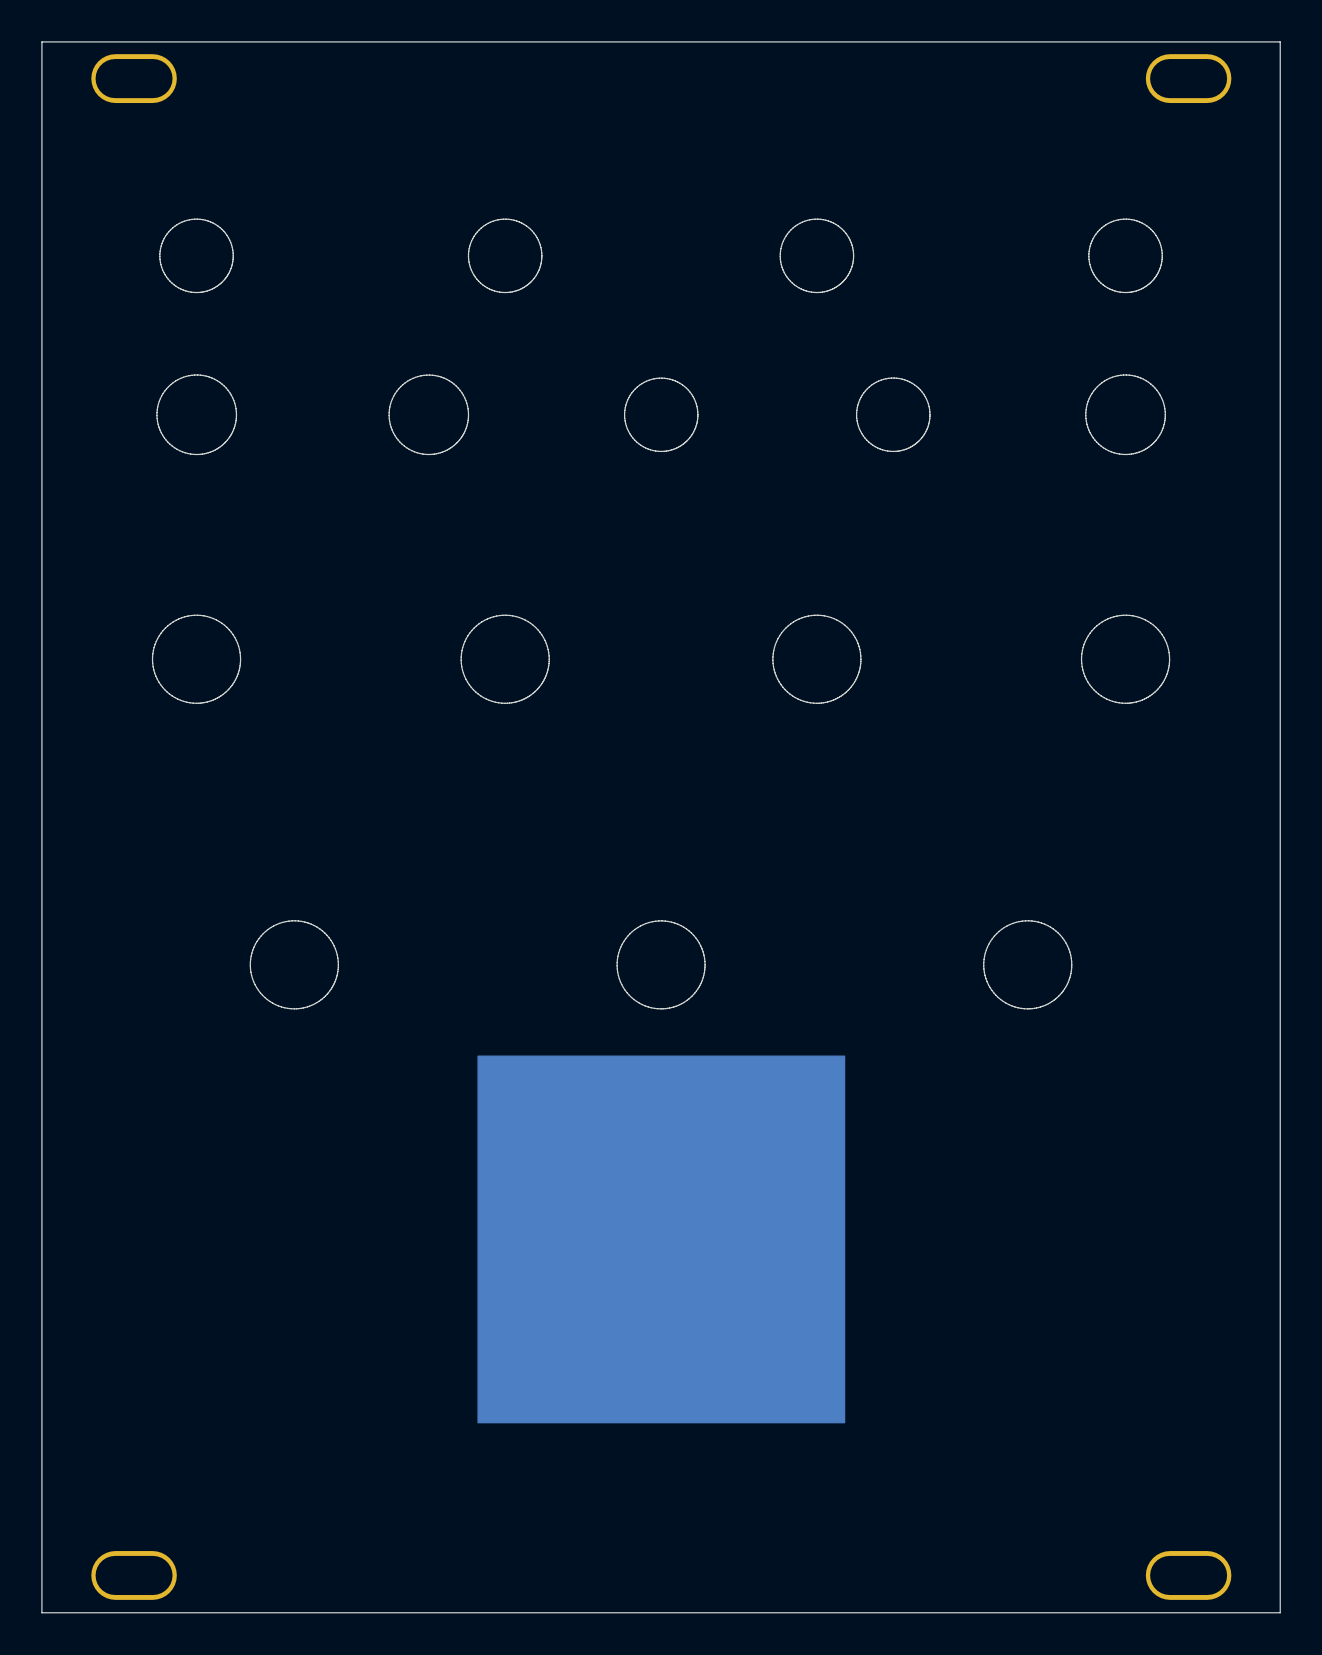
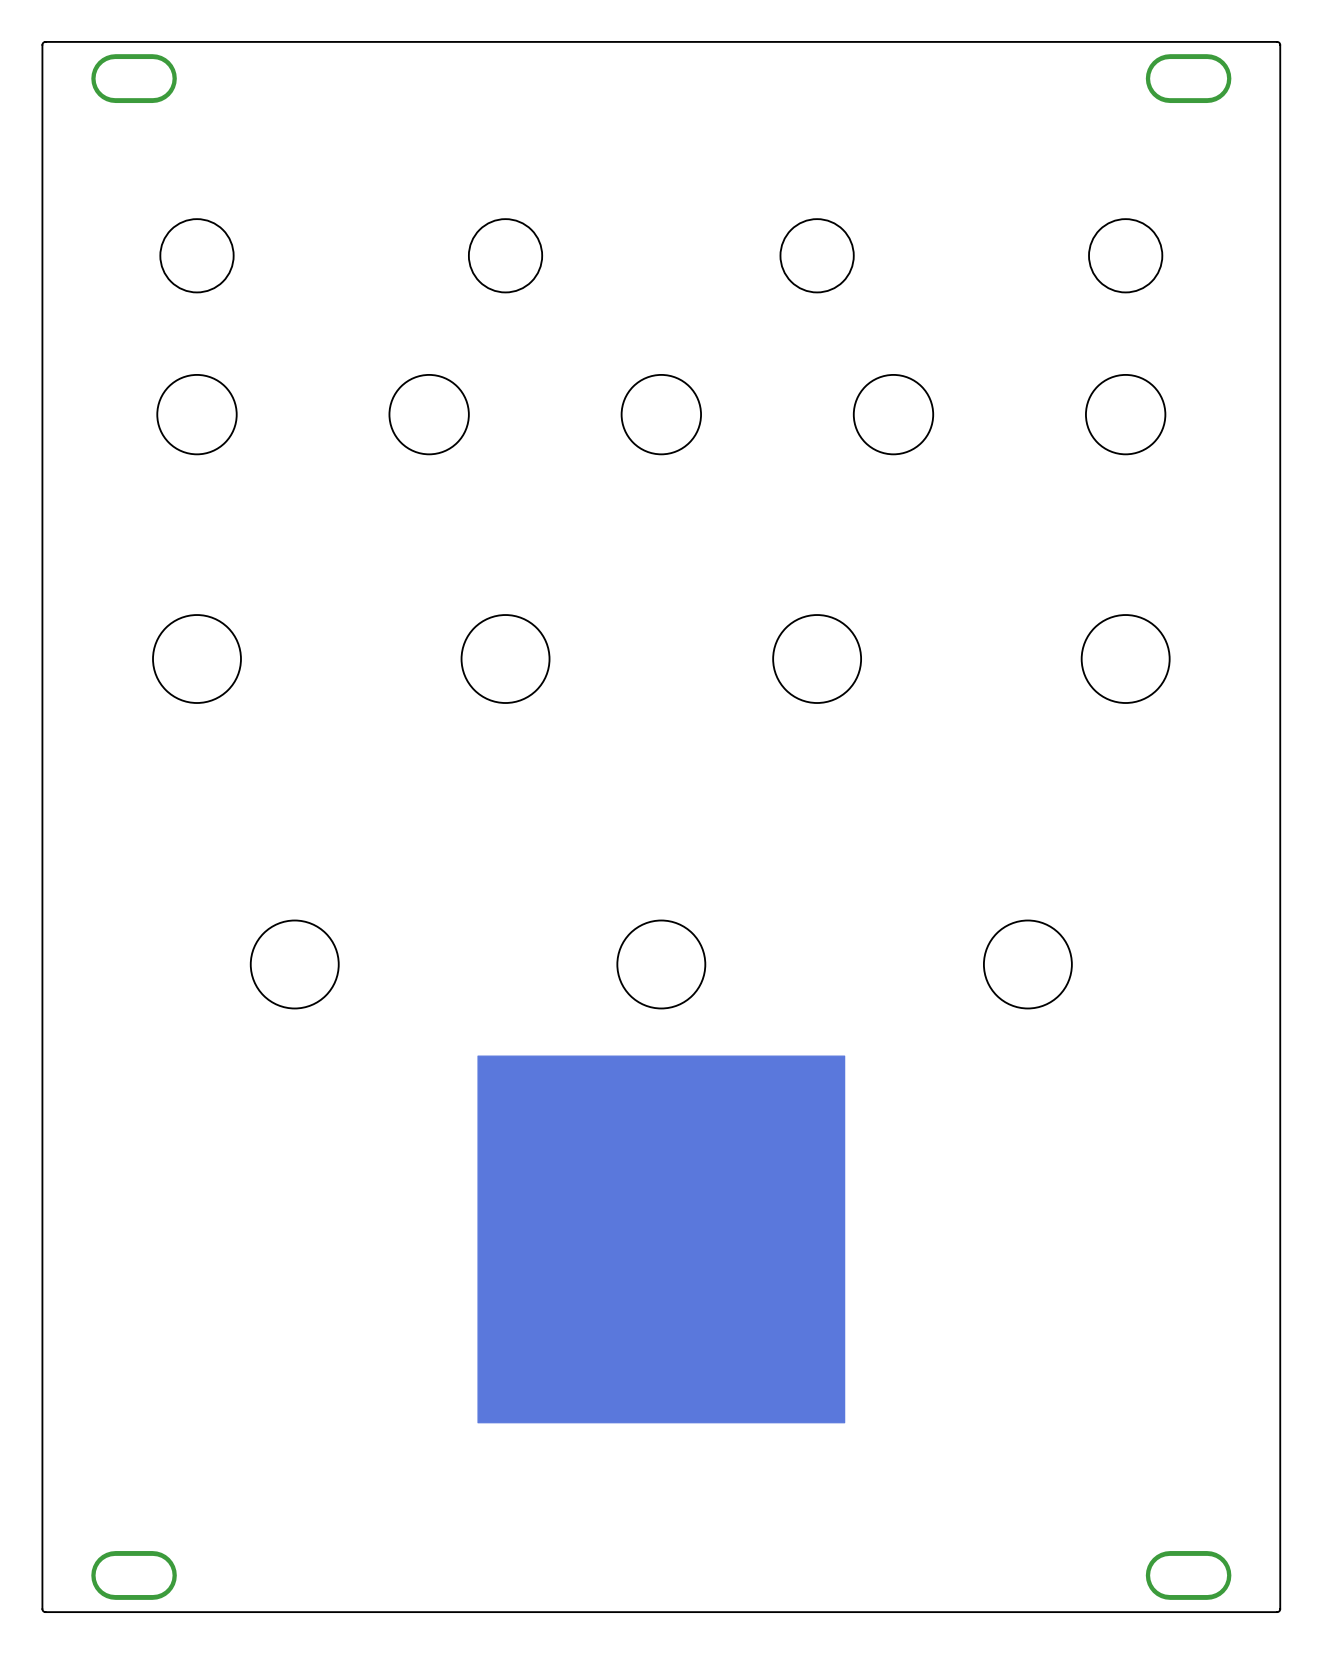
drawing: [41, 41, 1281, 1614] -> none
board edge: none -> (1277, 41) (43, 43) (43, 1611) (1279, 1610) (1280, 44) (1277, 41)
round board edge: none -> [160, 218, 234, 293]
round board edge: none -> [468, 218, 543, 293]
round board edge: none -> [780, 218, 855, 293]
round board edge: none -> [1088, 218, 1163, 293]
round board edge: none -> [156, 374, 238, 455]
round board edge: none -> [389, 374, 470, 455]
round board edge: none -> [621, 374, 702, 455]
round board edge: none -> [853, 374, 934, 455]
round board edge: none -> [1085, 374, 1166, 455]
round board edge: none -> [152, 614, 242, 704]
round board edge: none -> [461, 614, 550, 704]
round board edge: none -> [772, 614, 862, 704]
round board edge: none -> [1081, 614, 1170, 704]
round board edge: none -> [250, 920, 340, 1009]
round board edge: none -> [617, 920, 706, 1009]
round board edge: none -> [983, 920, 1073, 1009]

